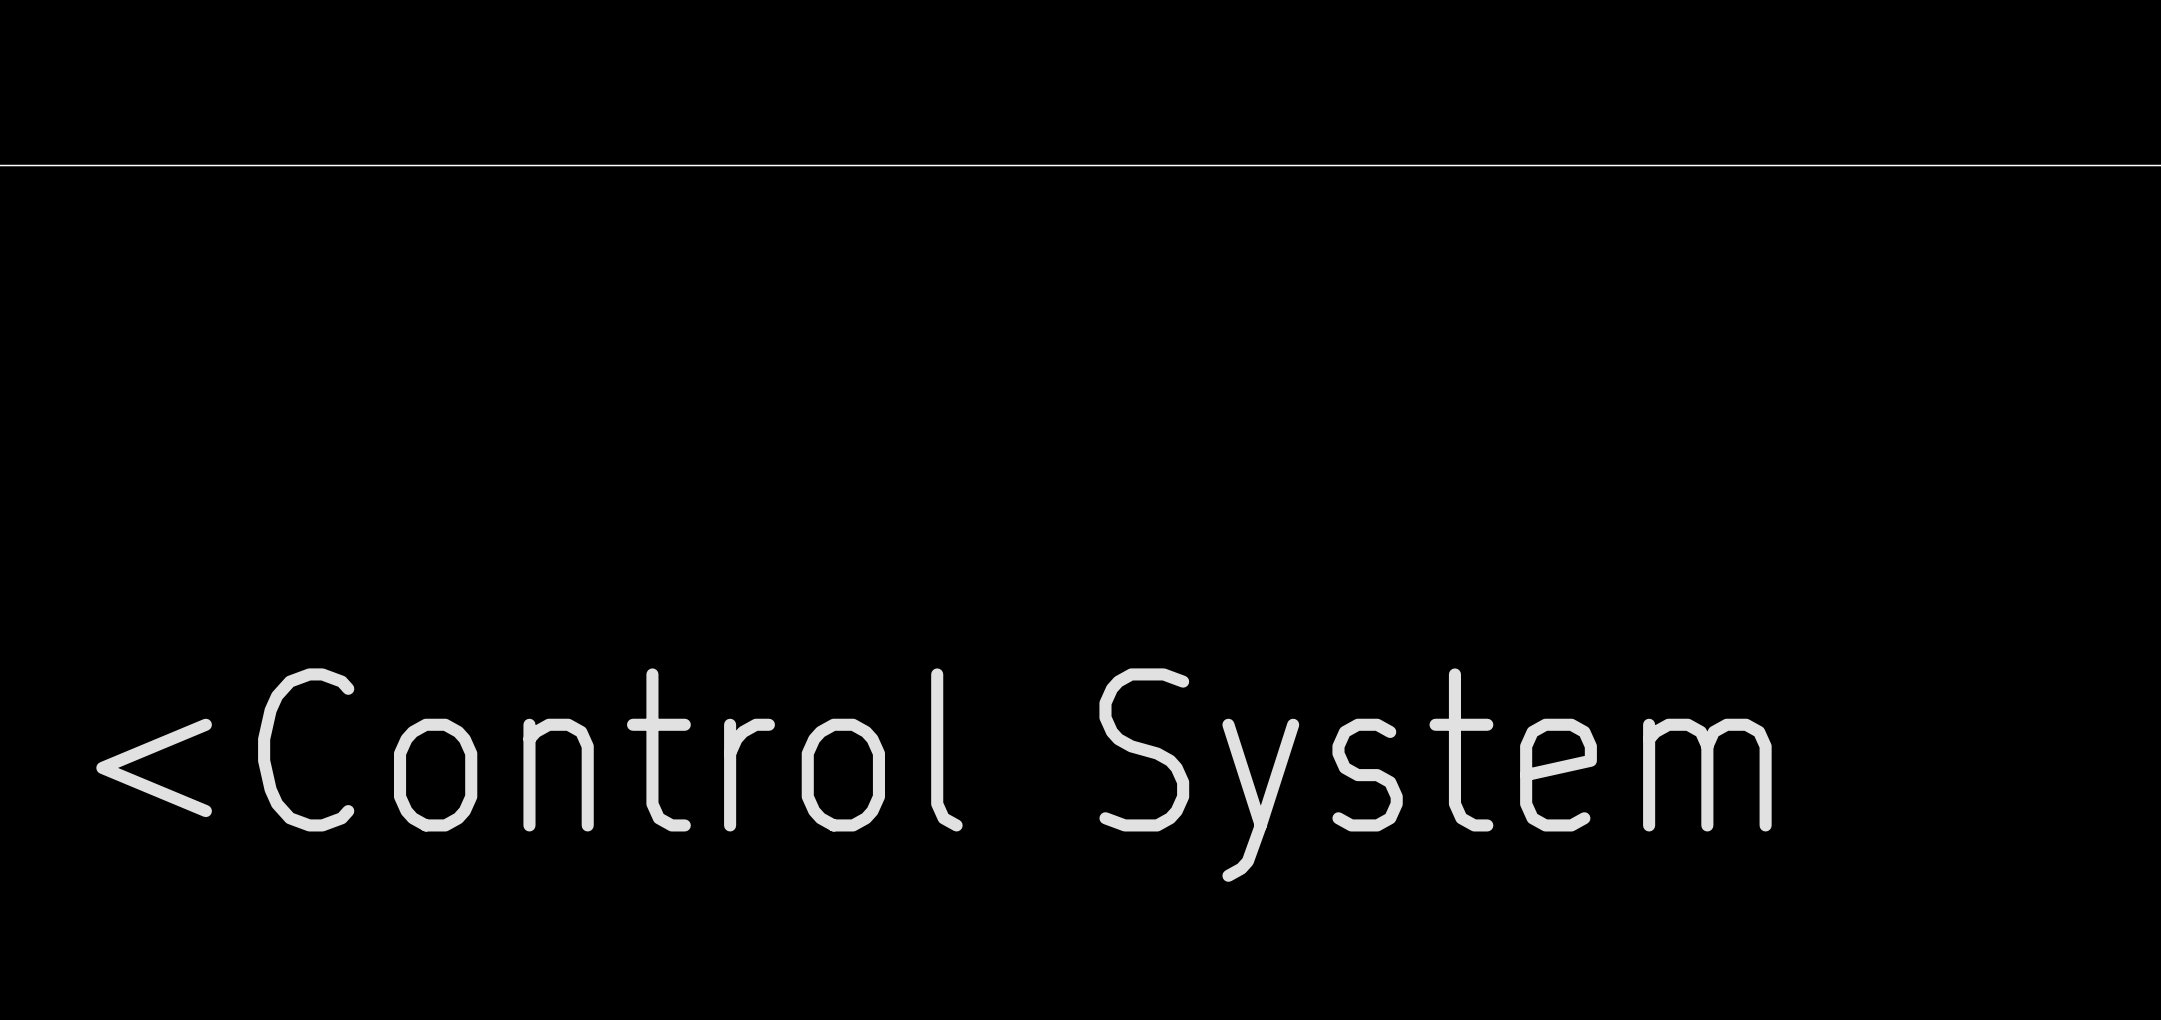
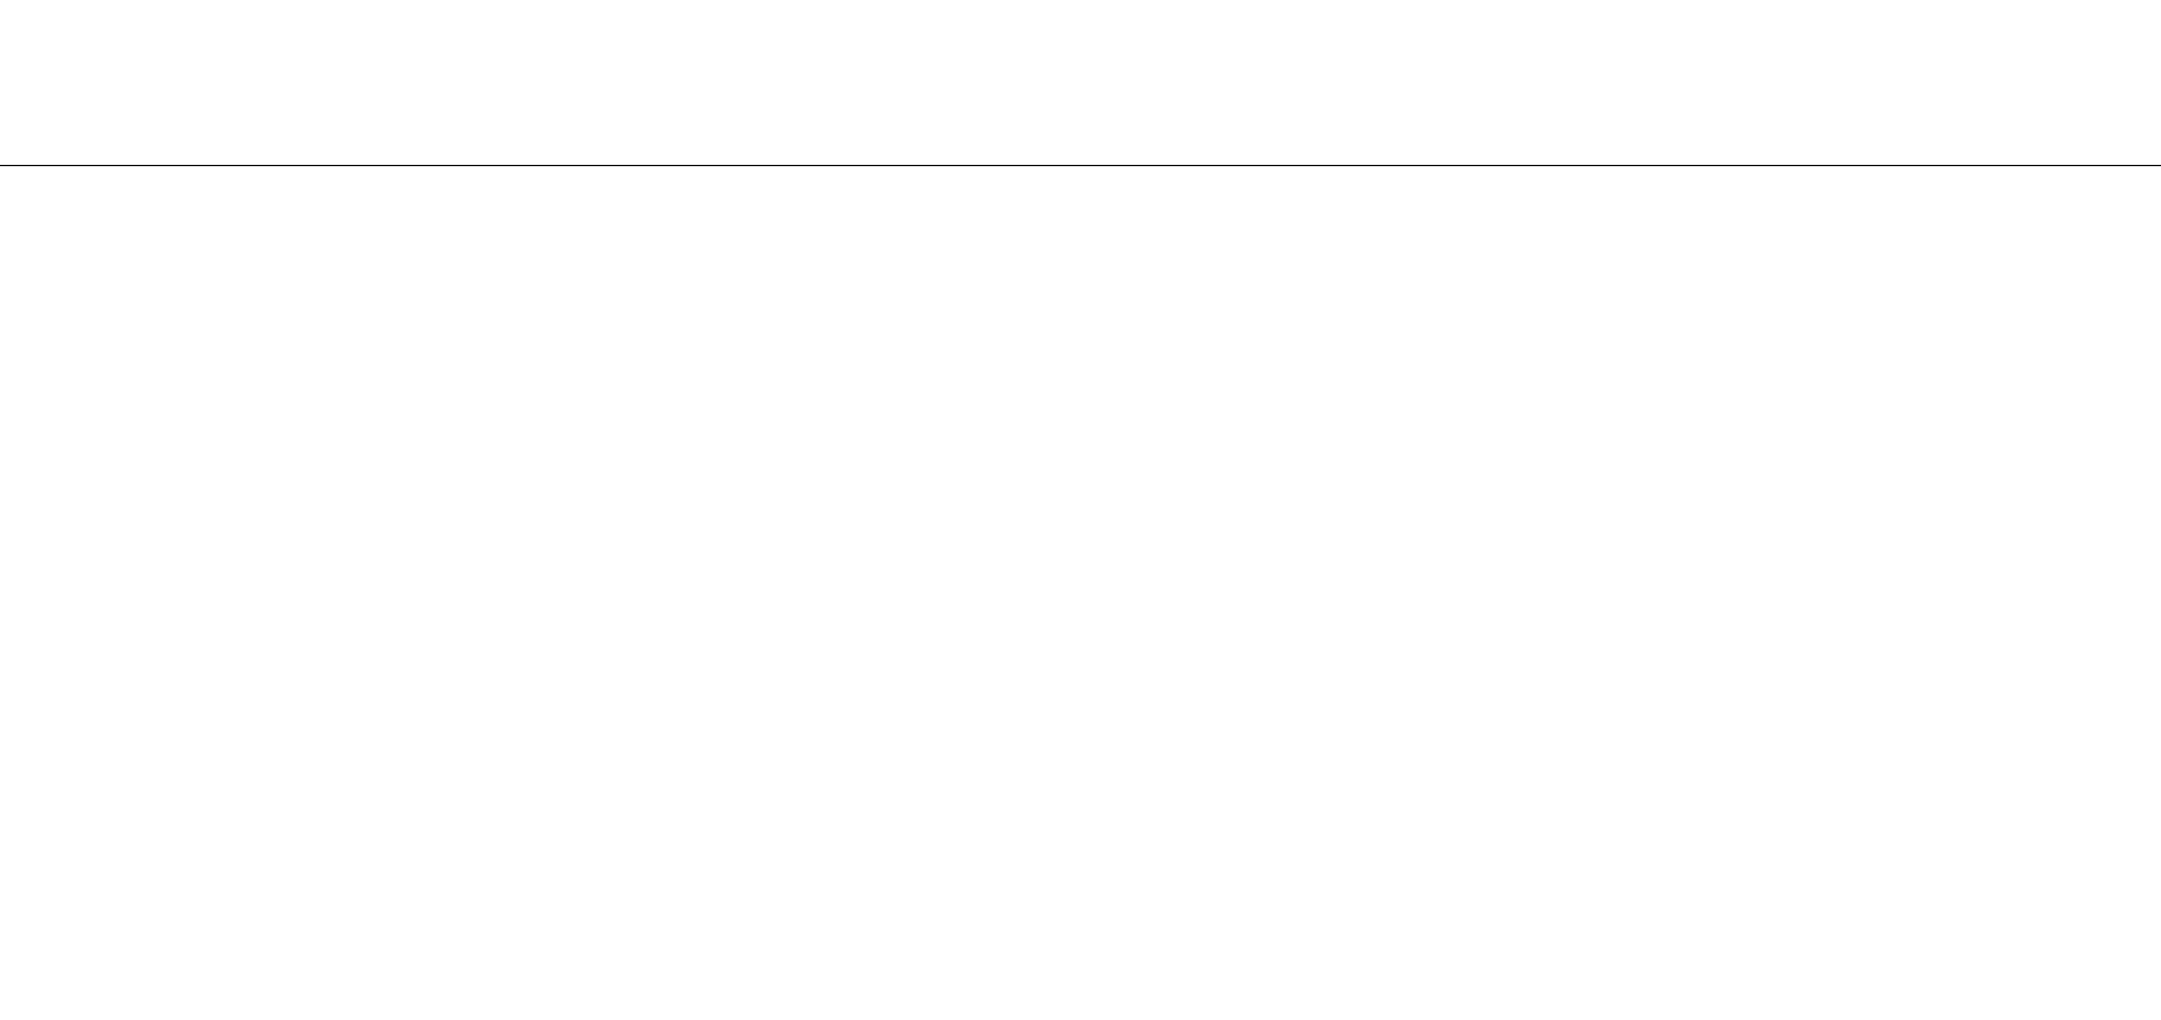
text: <Control System (933, 775) -> none

